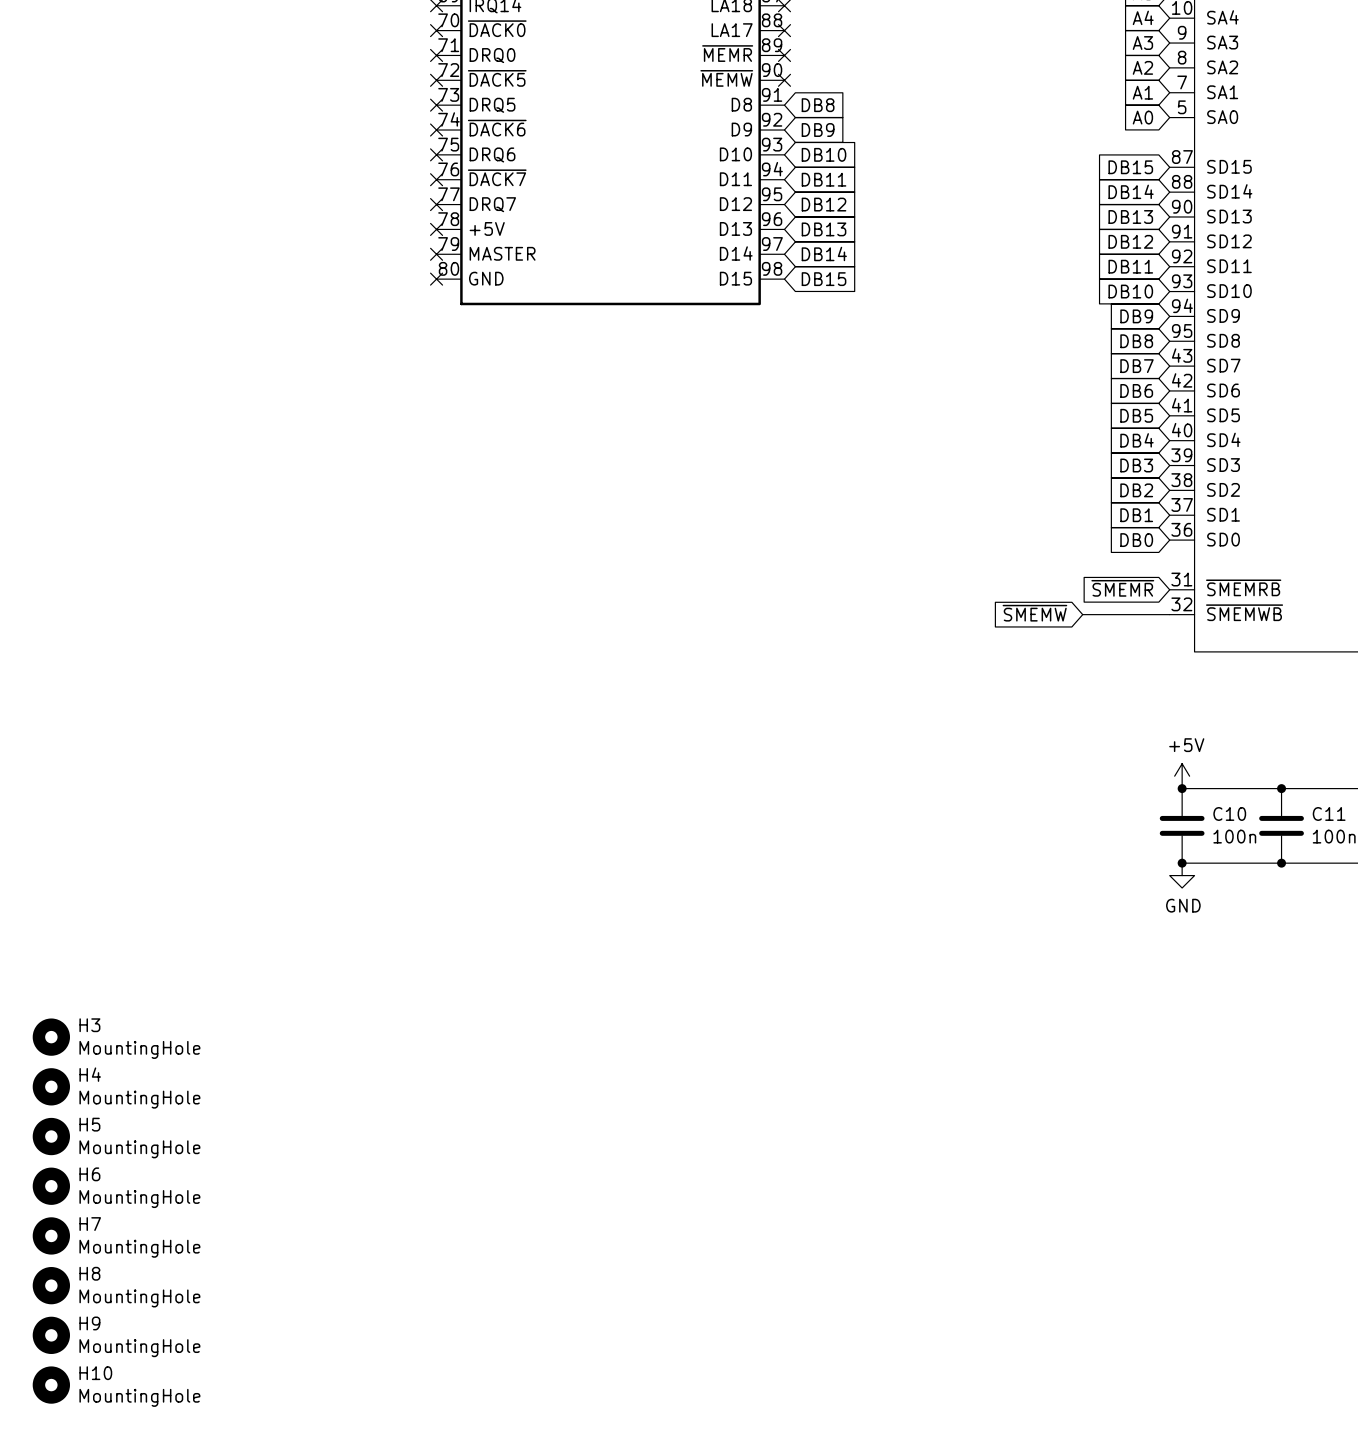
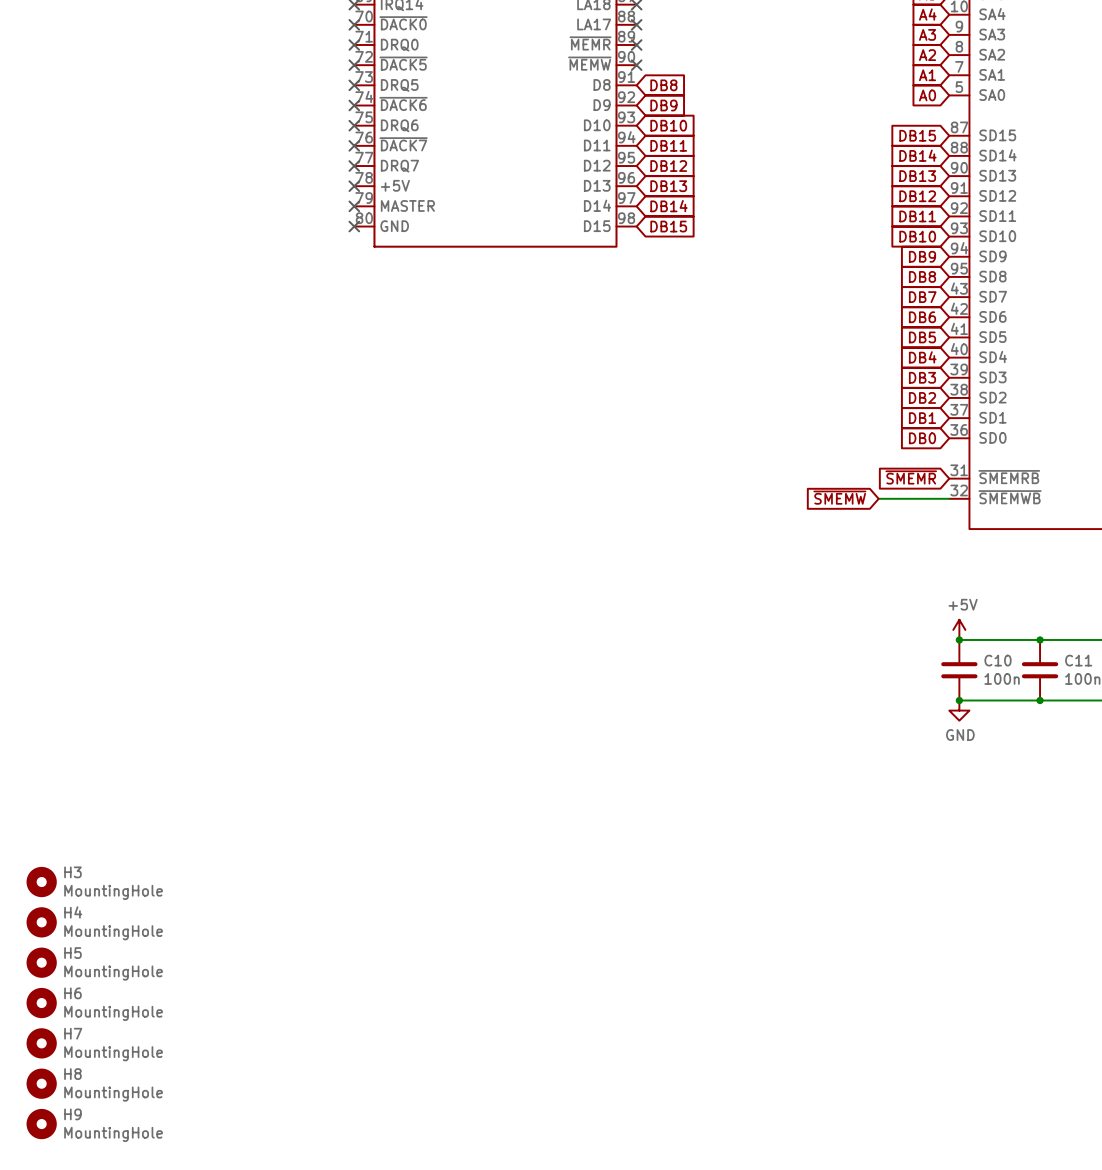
H3: MountingHole (51, 1037) -> none
H4 name: H4 (90, 1074) -> H3 (72, 872)
H5 name: H5 (89, 1124) -> H4 (73, 912)
H6 name: H6 (89, 1174) -> H5 (72, 953)
H7 name: H7 (90, 1224) -> H6 (72, 993)
H8 name: H8 (89, 1273) -> H7 (73, 1033)
H9 name: H9 (89, 1323) -> H8 (72, 1074)
H10 name: H10 (95, 1373) -> H9 (72, 1114)

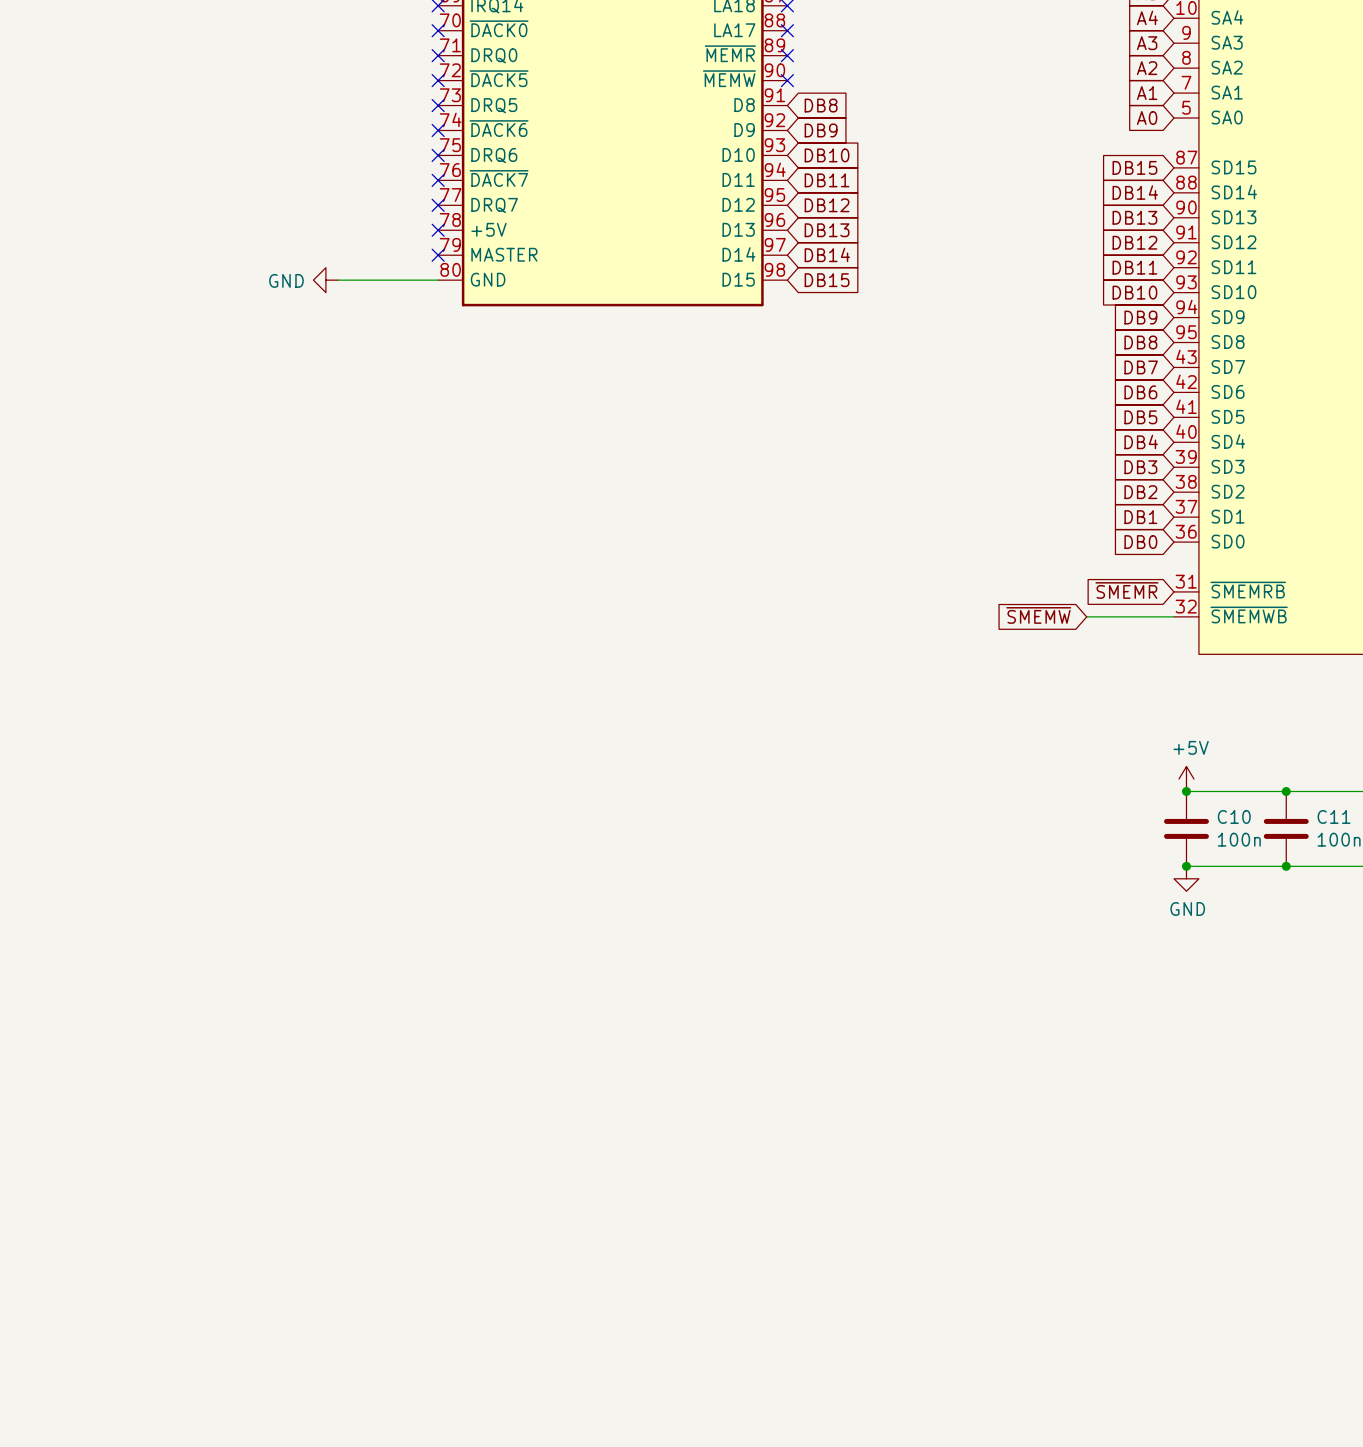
power symbol: none -> GND (325, 280)
wire: none -> (338, 280) (438, 280)
no-connect mark: (354, 226) -> none
H3: MountingHole (41, 882) -> none
H4: MountingHole (41, 922) -> none
H5: MountingHole (41, 962) -> none
H6: MountingHole (41, 1003) -> none
H7: MountingHole (41, 1043) -> none
H8: MountingHole (41, 1083) -> none
H9: MountingHole (41, 1124) -> none

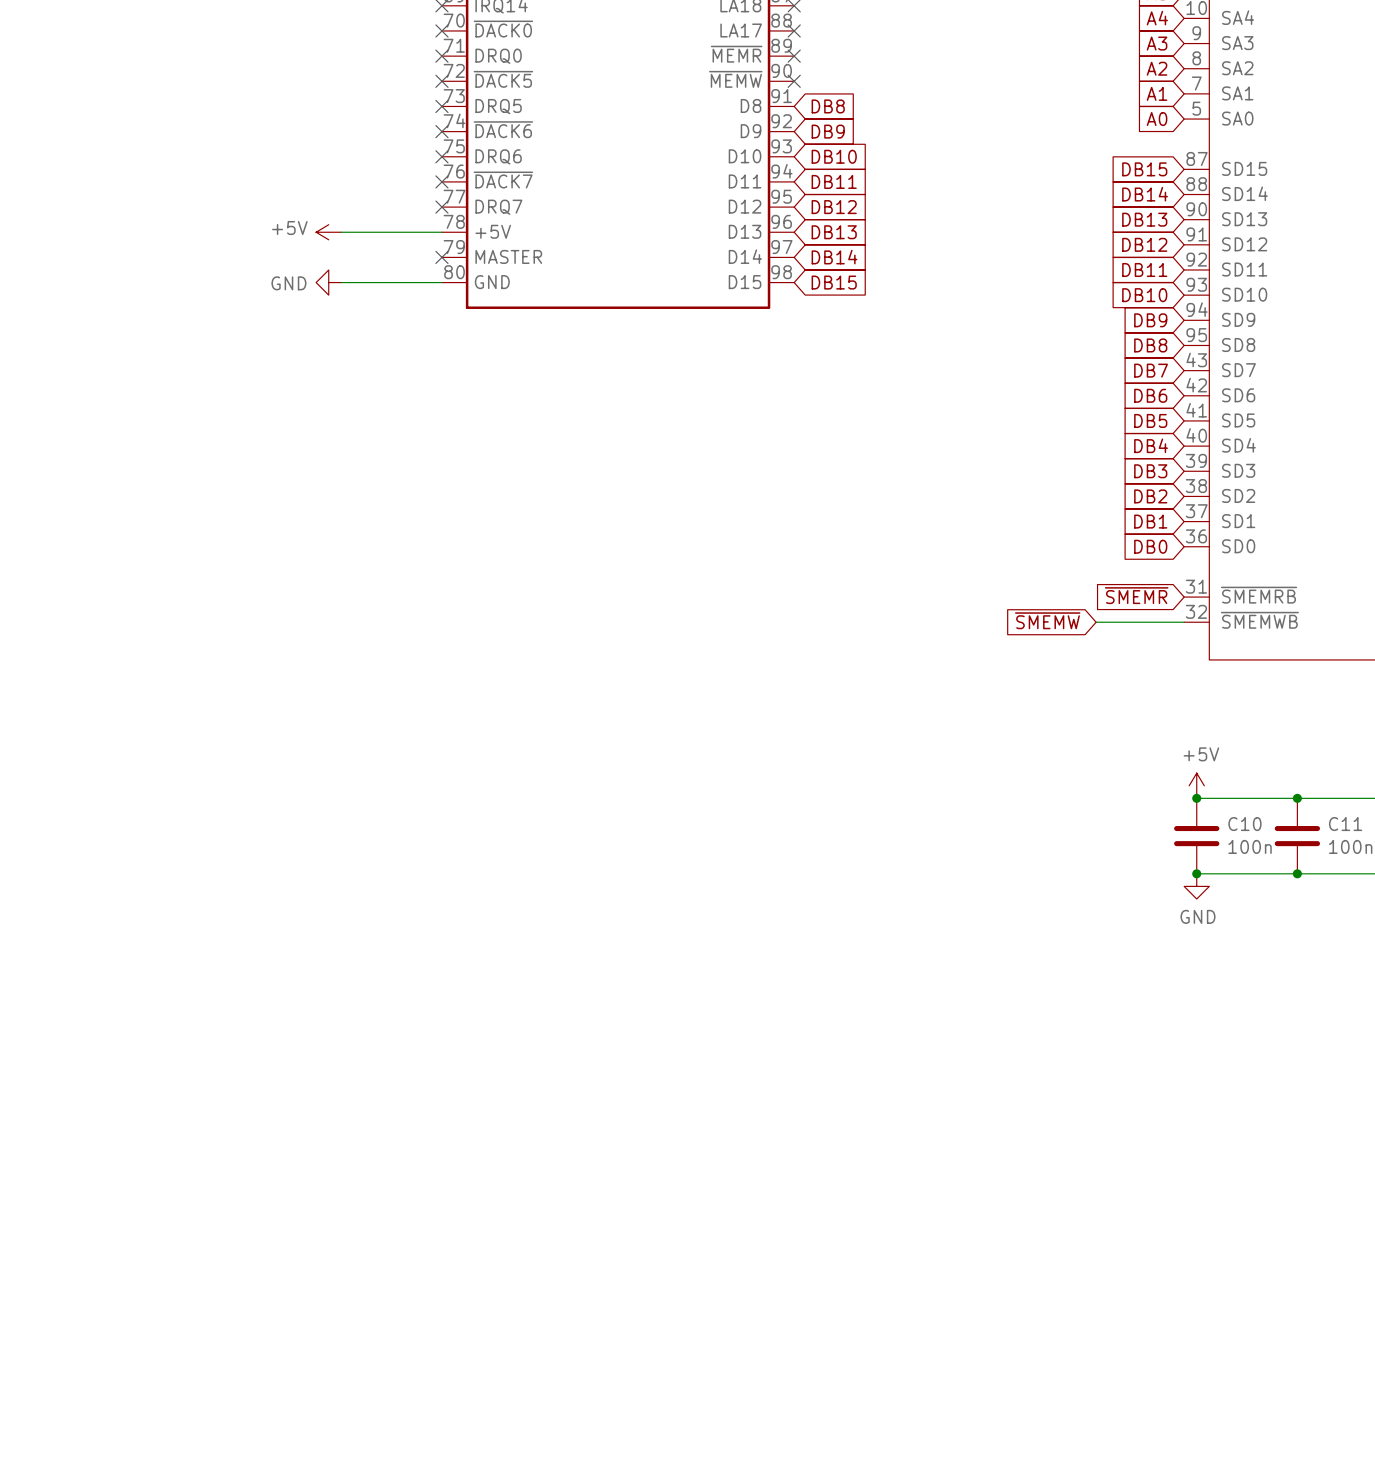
power symbol: none -> +5V (328, 232)
wire: none -> (341, 232) (441, 232)
no-connect mark: (438, 230) -> none

